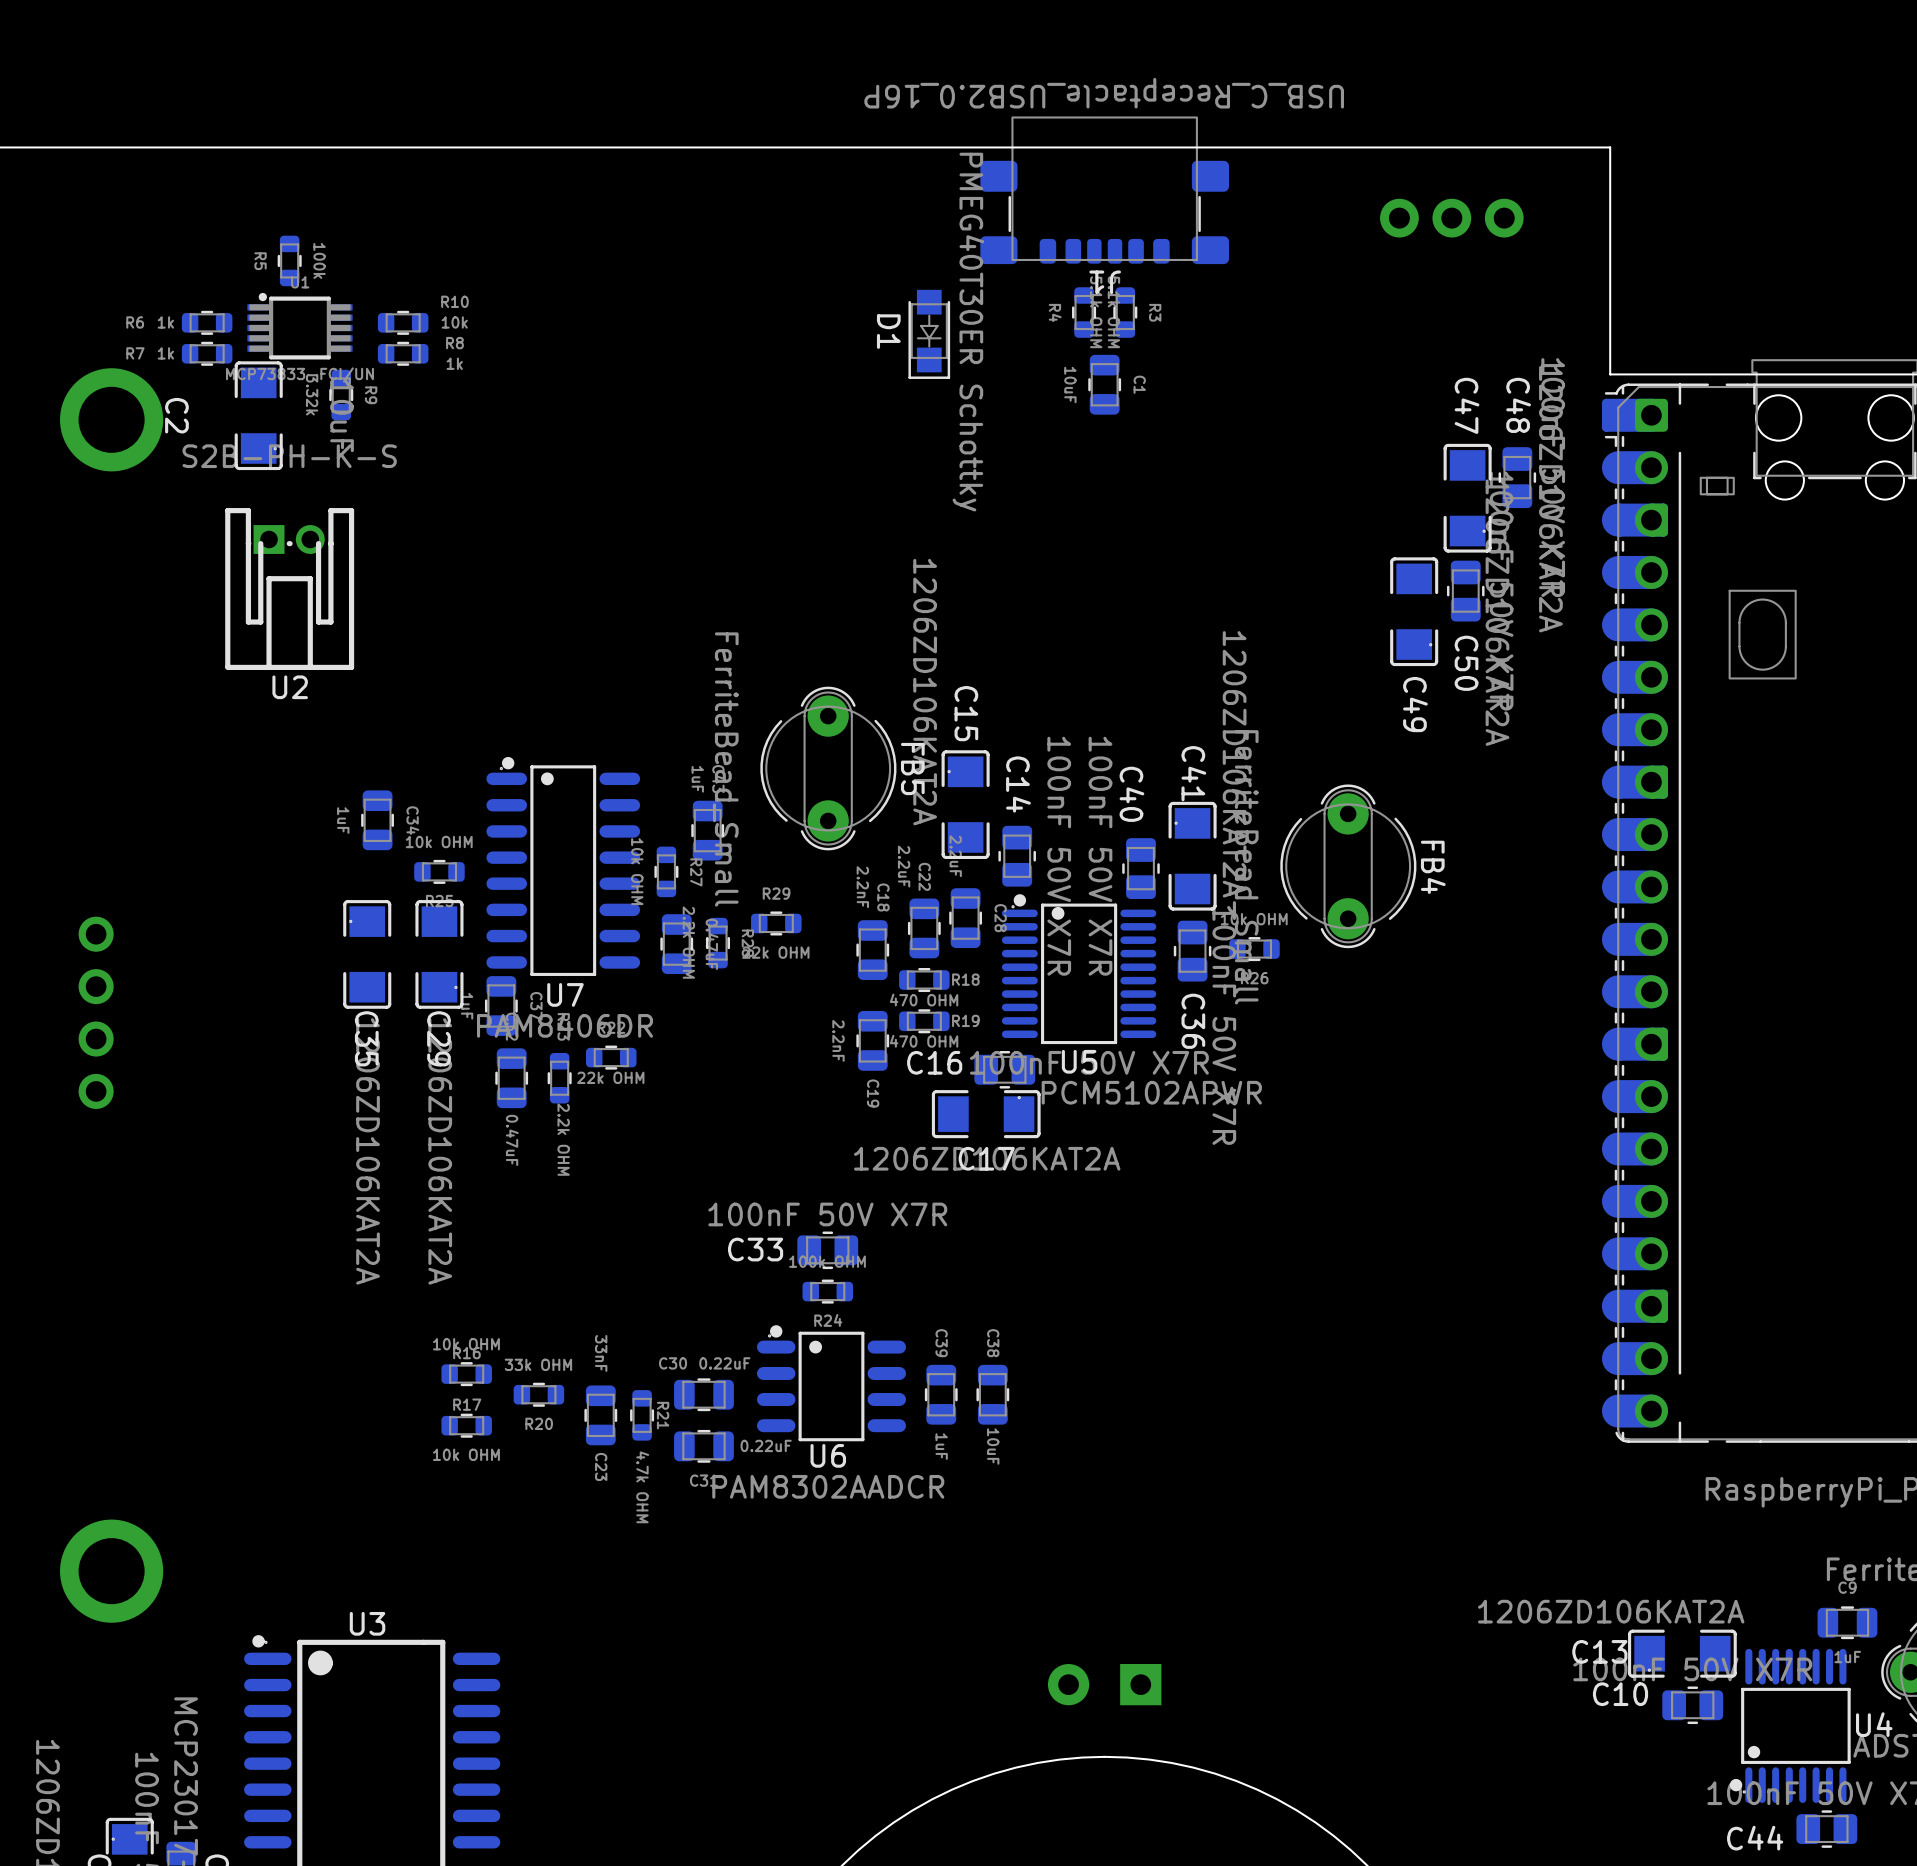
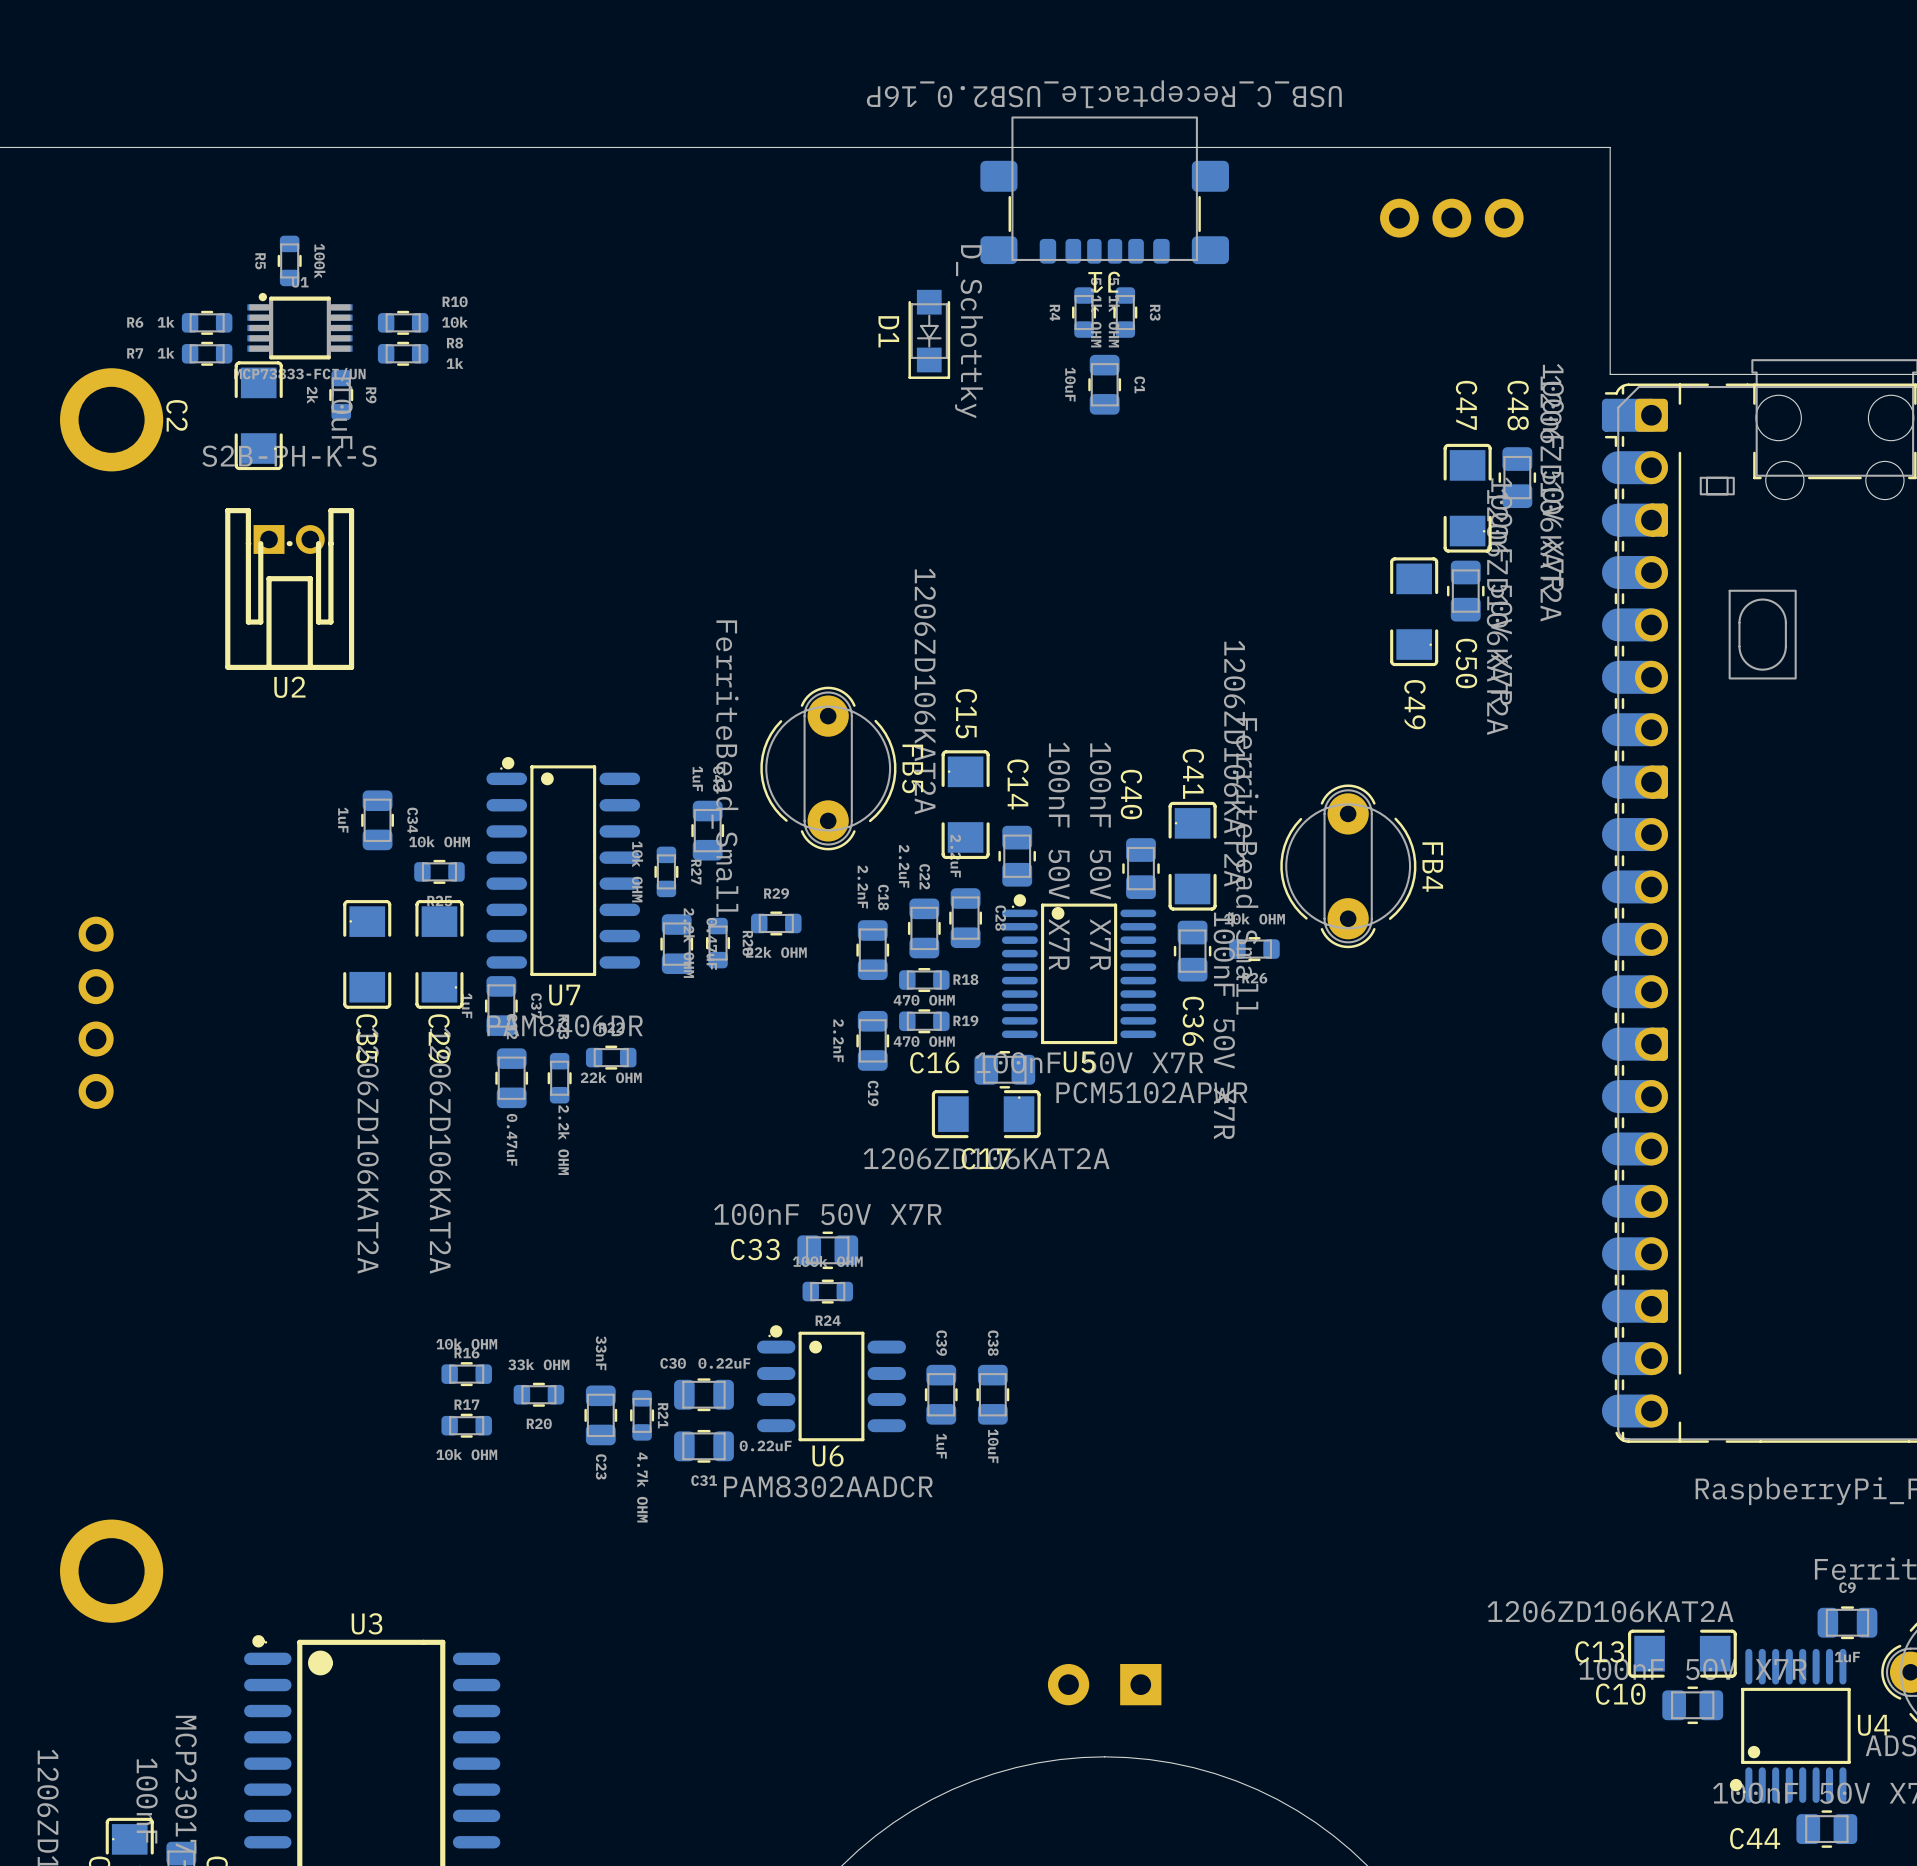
D1 value: PMEG40T30ER Schottky (968, 332) -> D_Schottky (969, 331)
R9 value: 3.32k (312, 394) -> 2k (312, 395)

